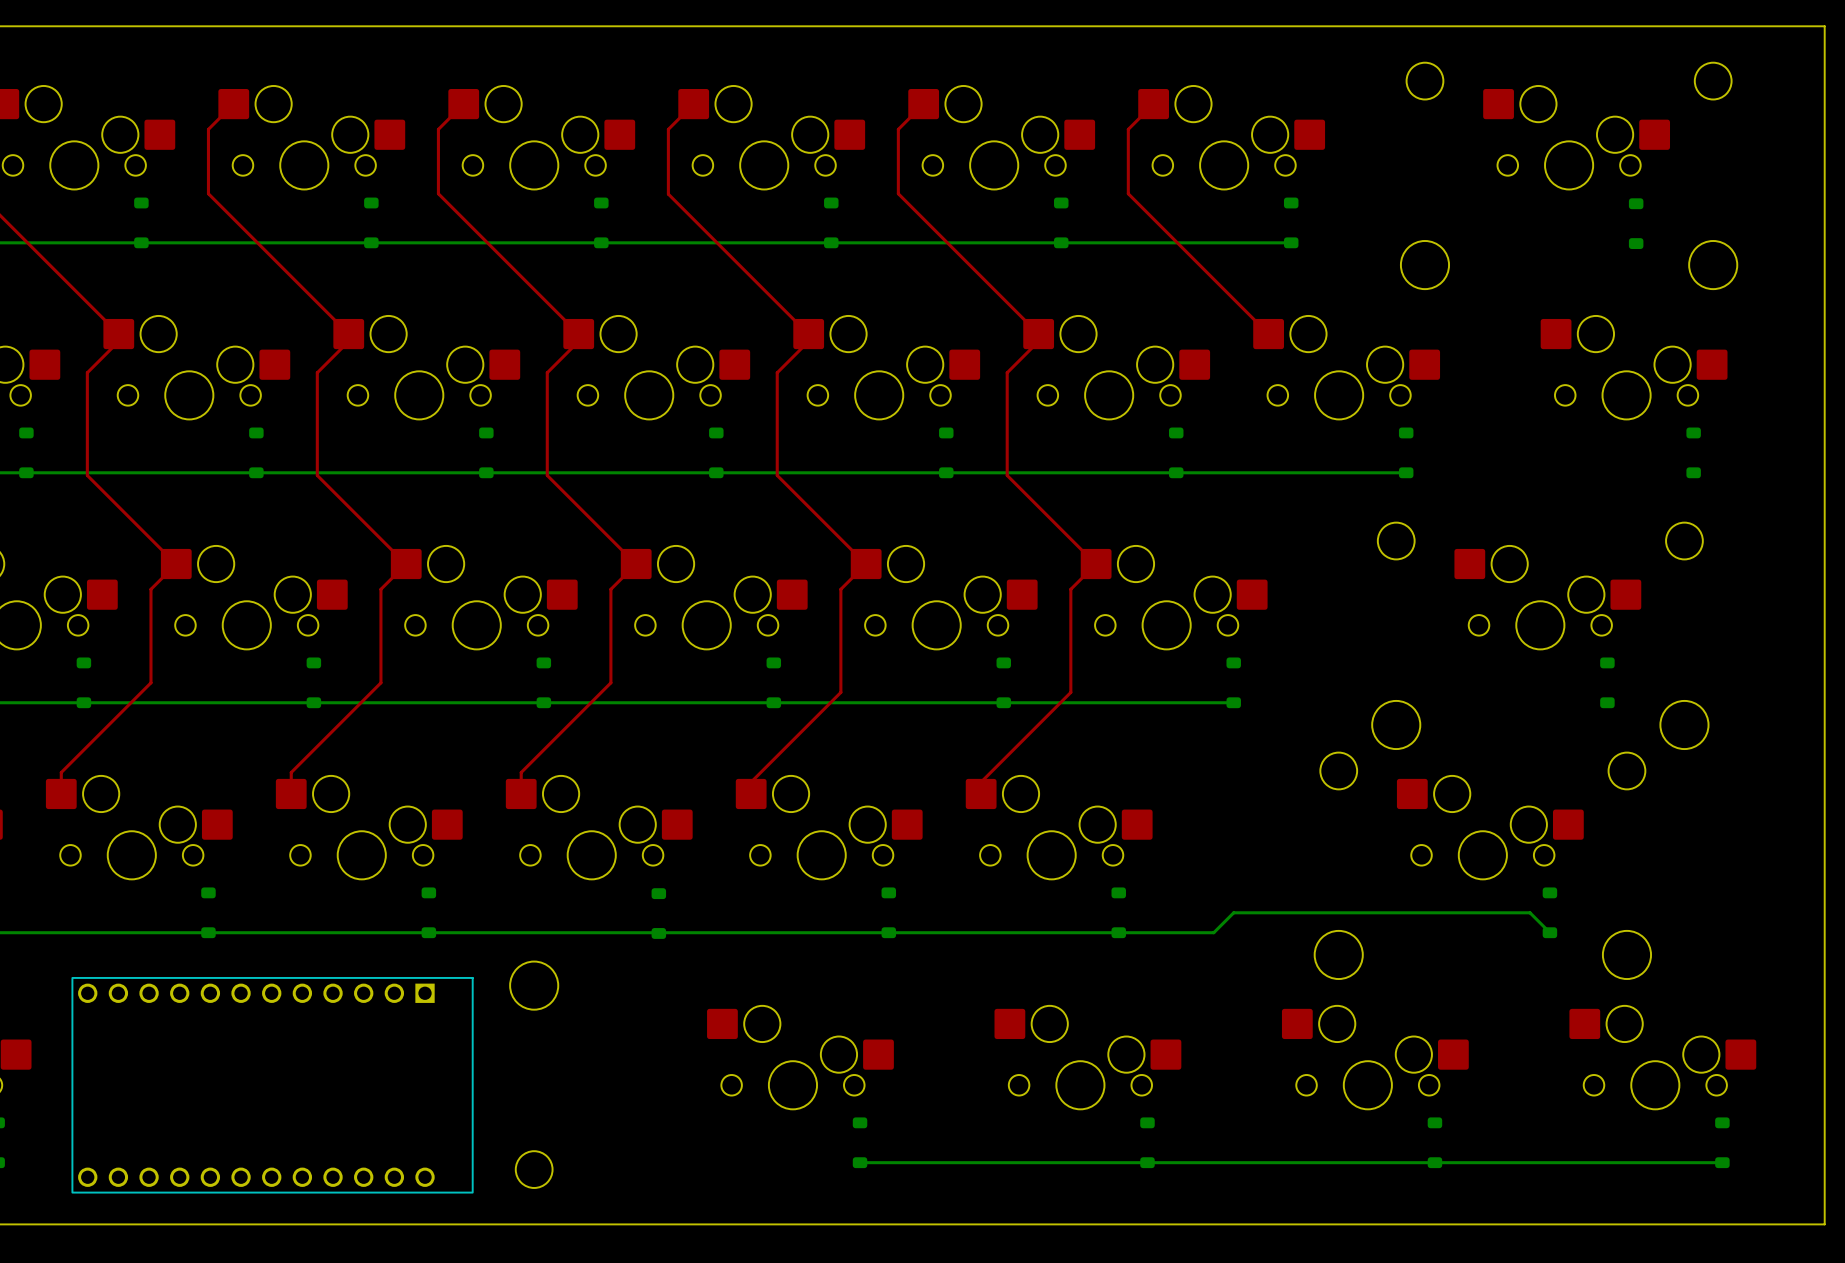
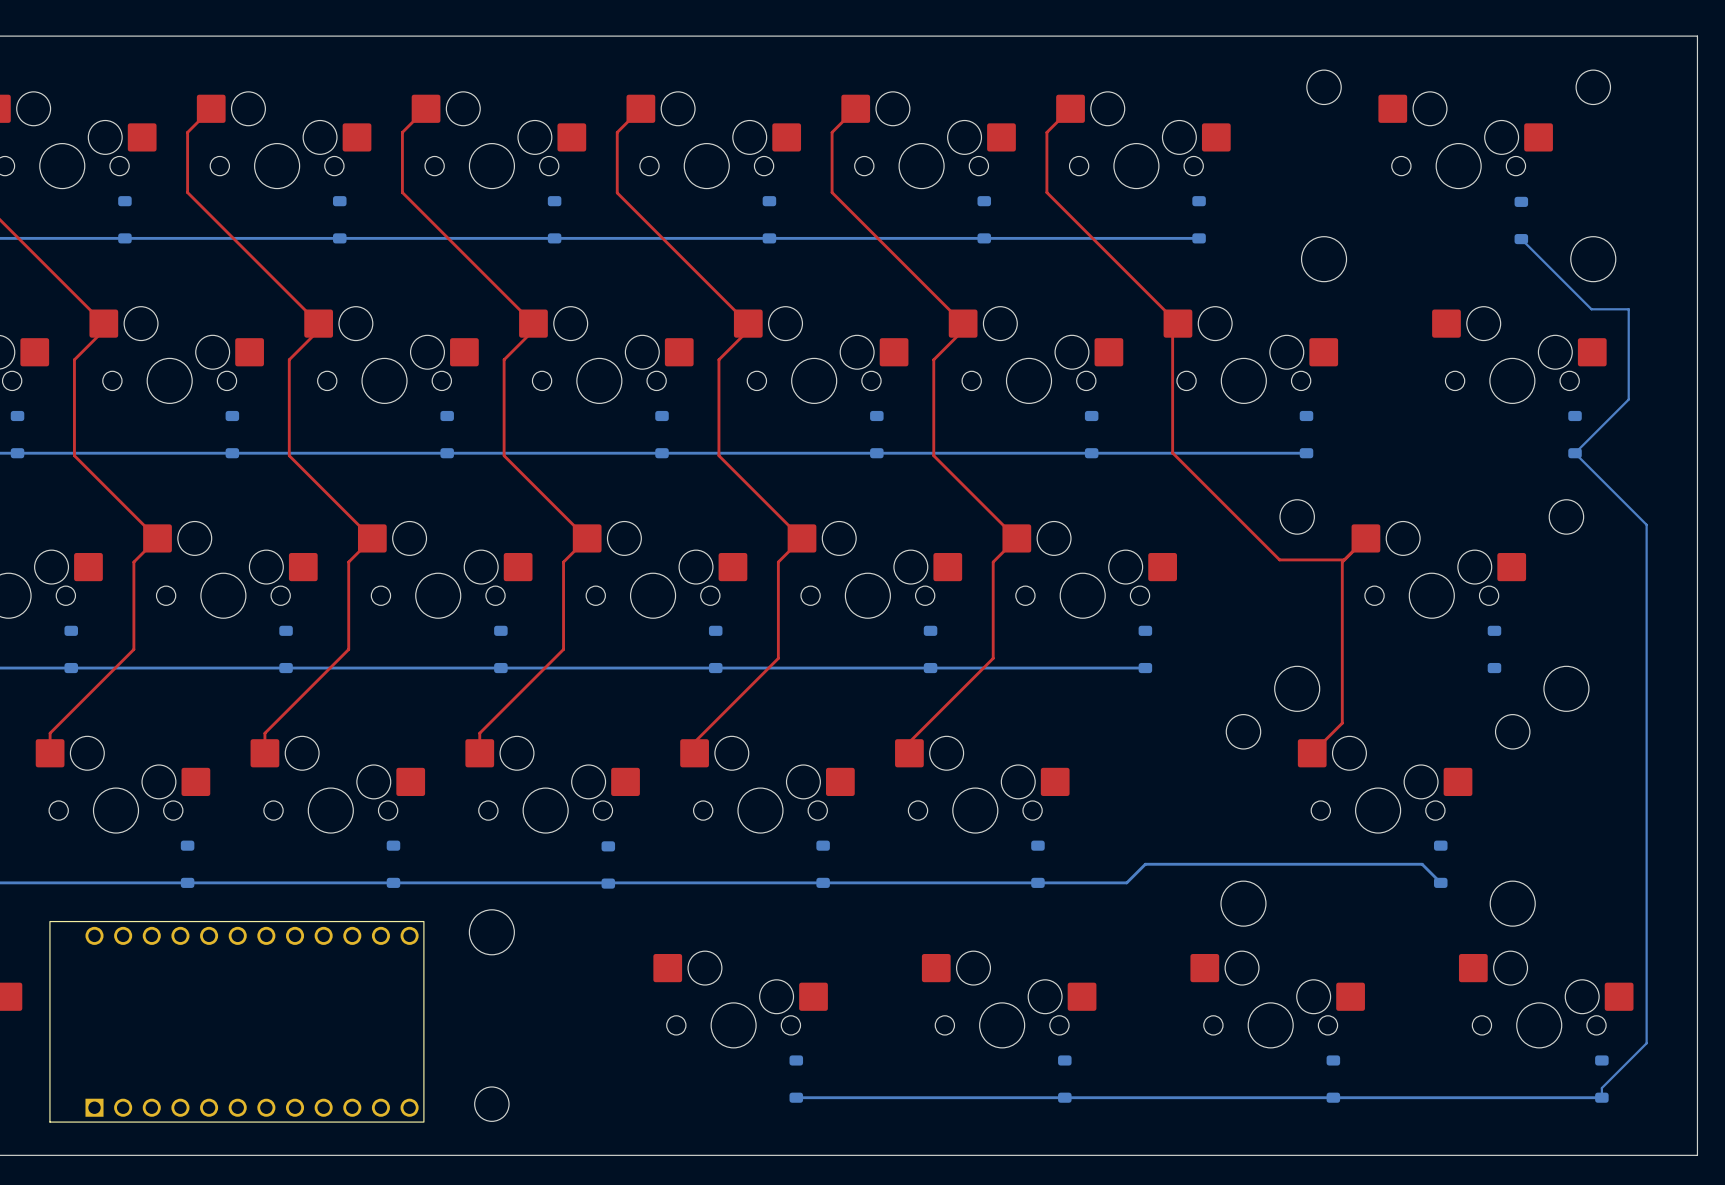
bottom track: none -> (1521, 239) (1591, 309) (1628, 309) (1628, 399) (1575, 453) (1646, 524) (1646, 1043) (1601, 1088) (1601, 1097)
top track: none -> (1177, 323) (1172, 328) (1172, 452) (1279, 559) (1344, 559)
top track: none -> (1365, 538) (1342, 562) (1342, 723) (1312, 753)
part rotation: 0° (272, 1085) -> 180° (236, 1021)

